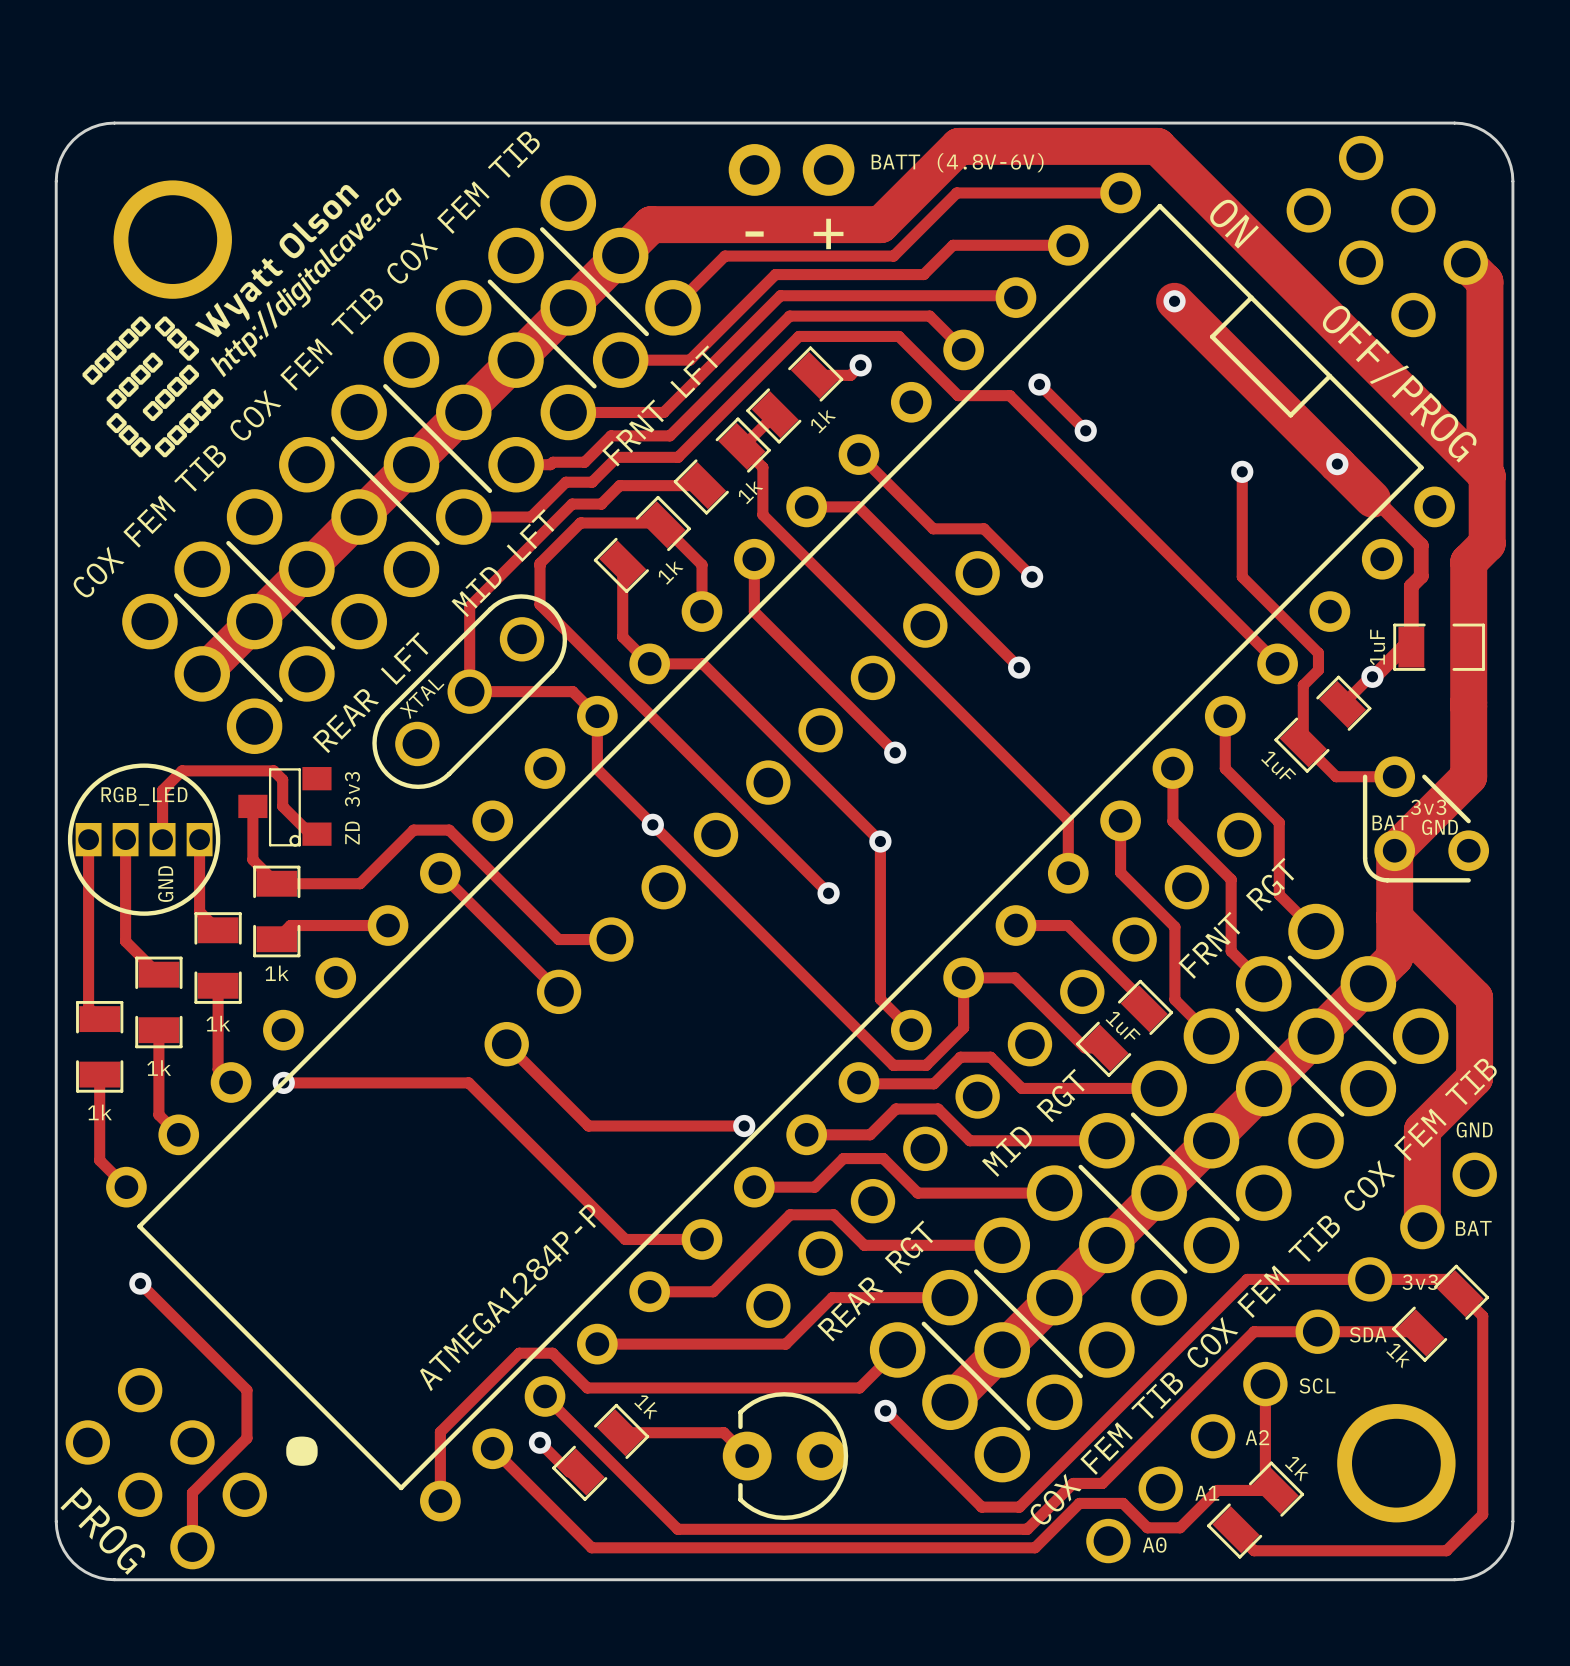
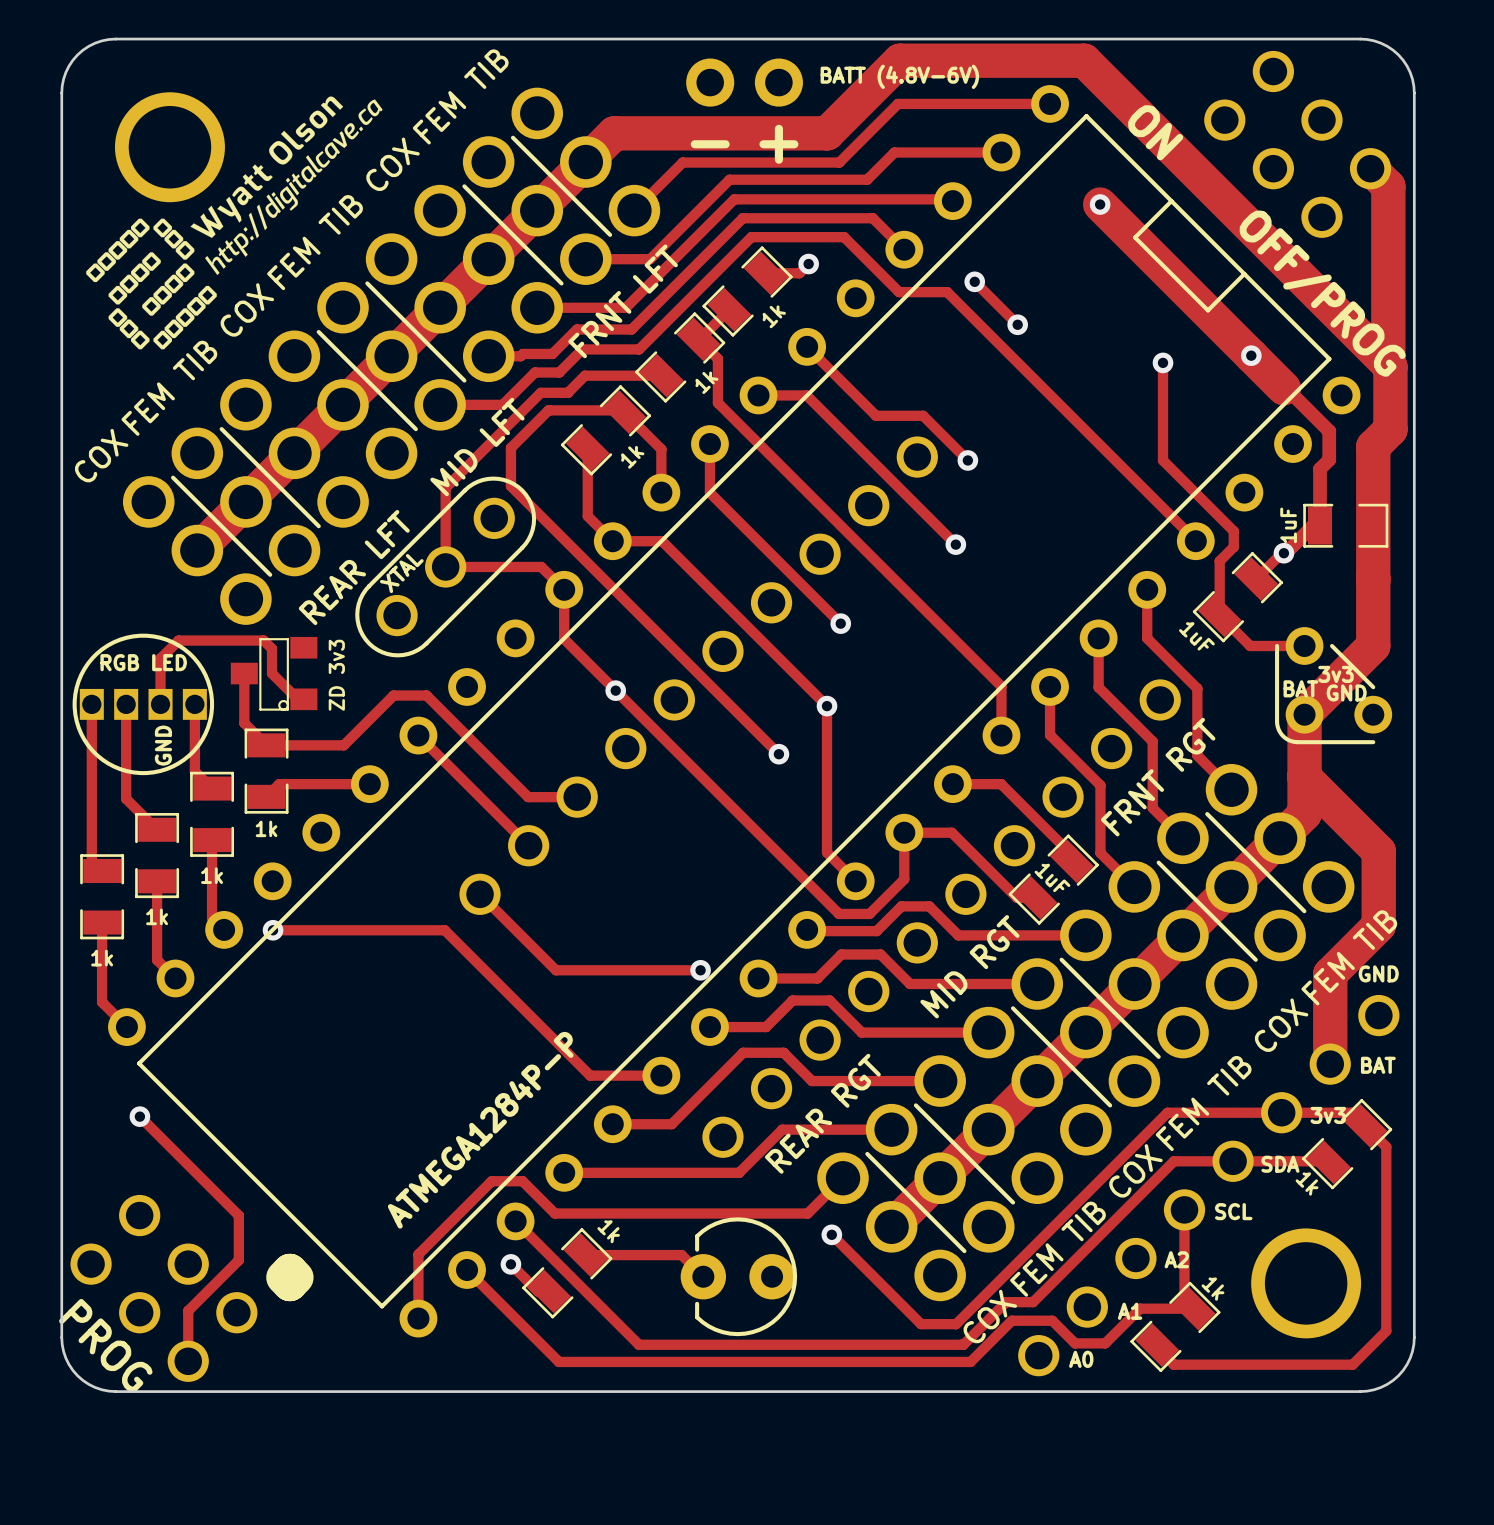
part value: RGB_LED (144, 796) -> RGB LED (143, 662)

